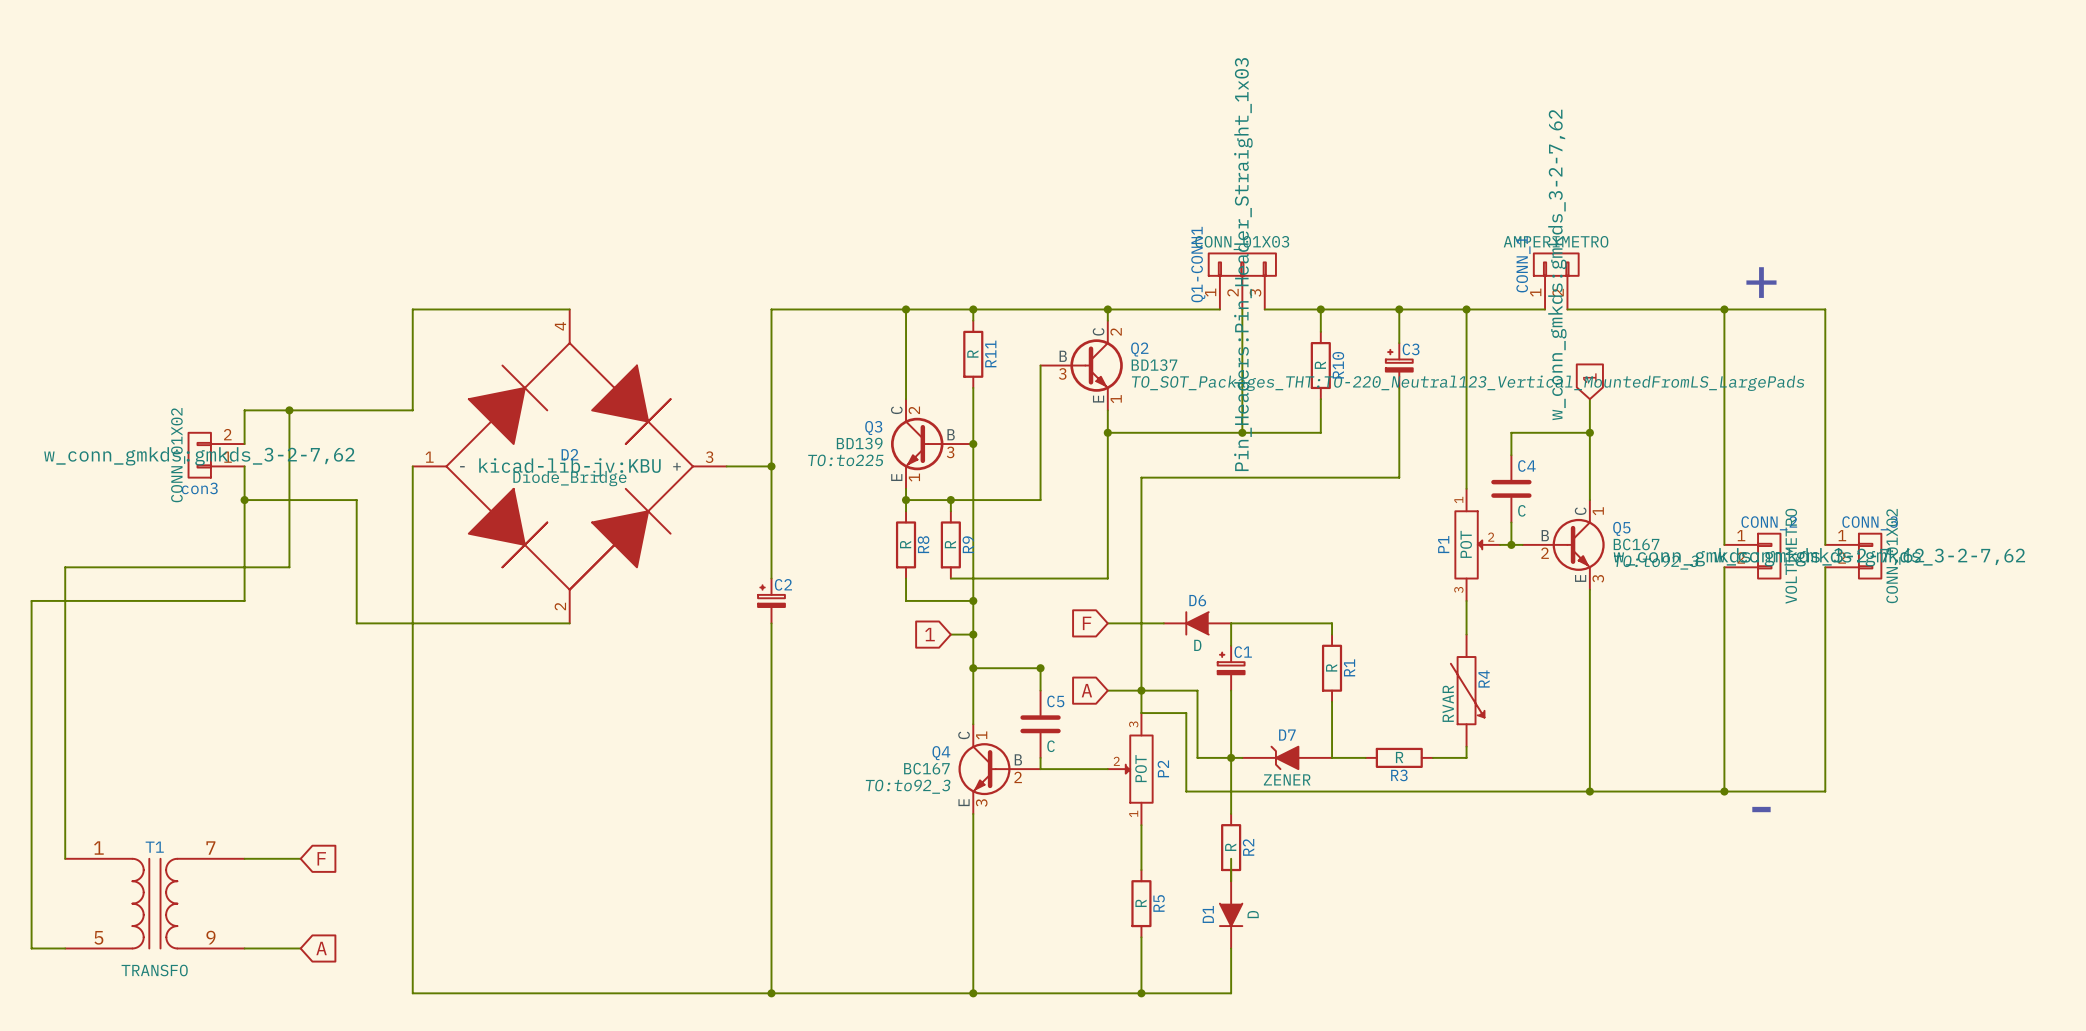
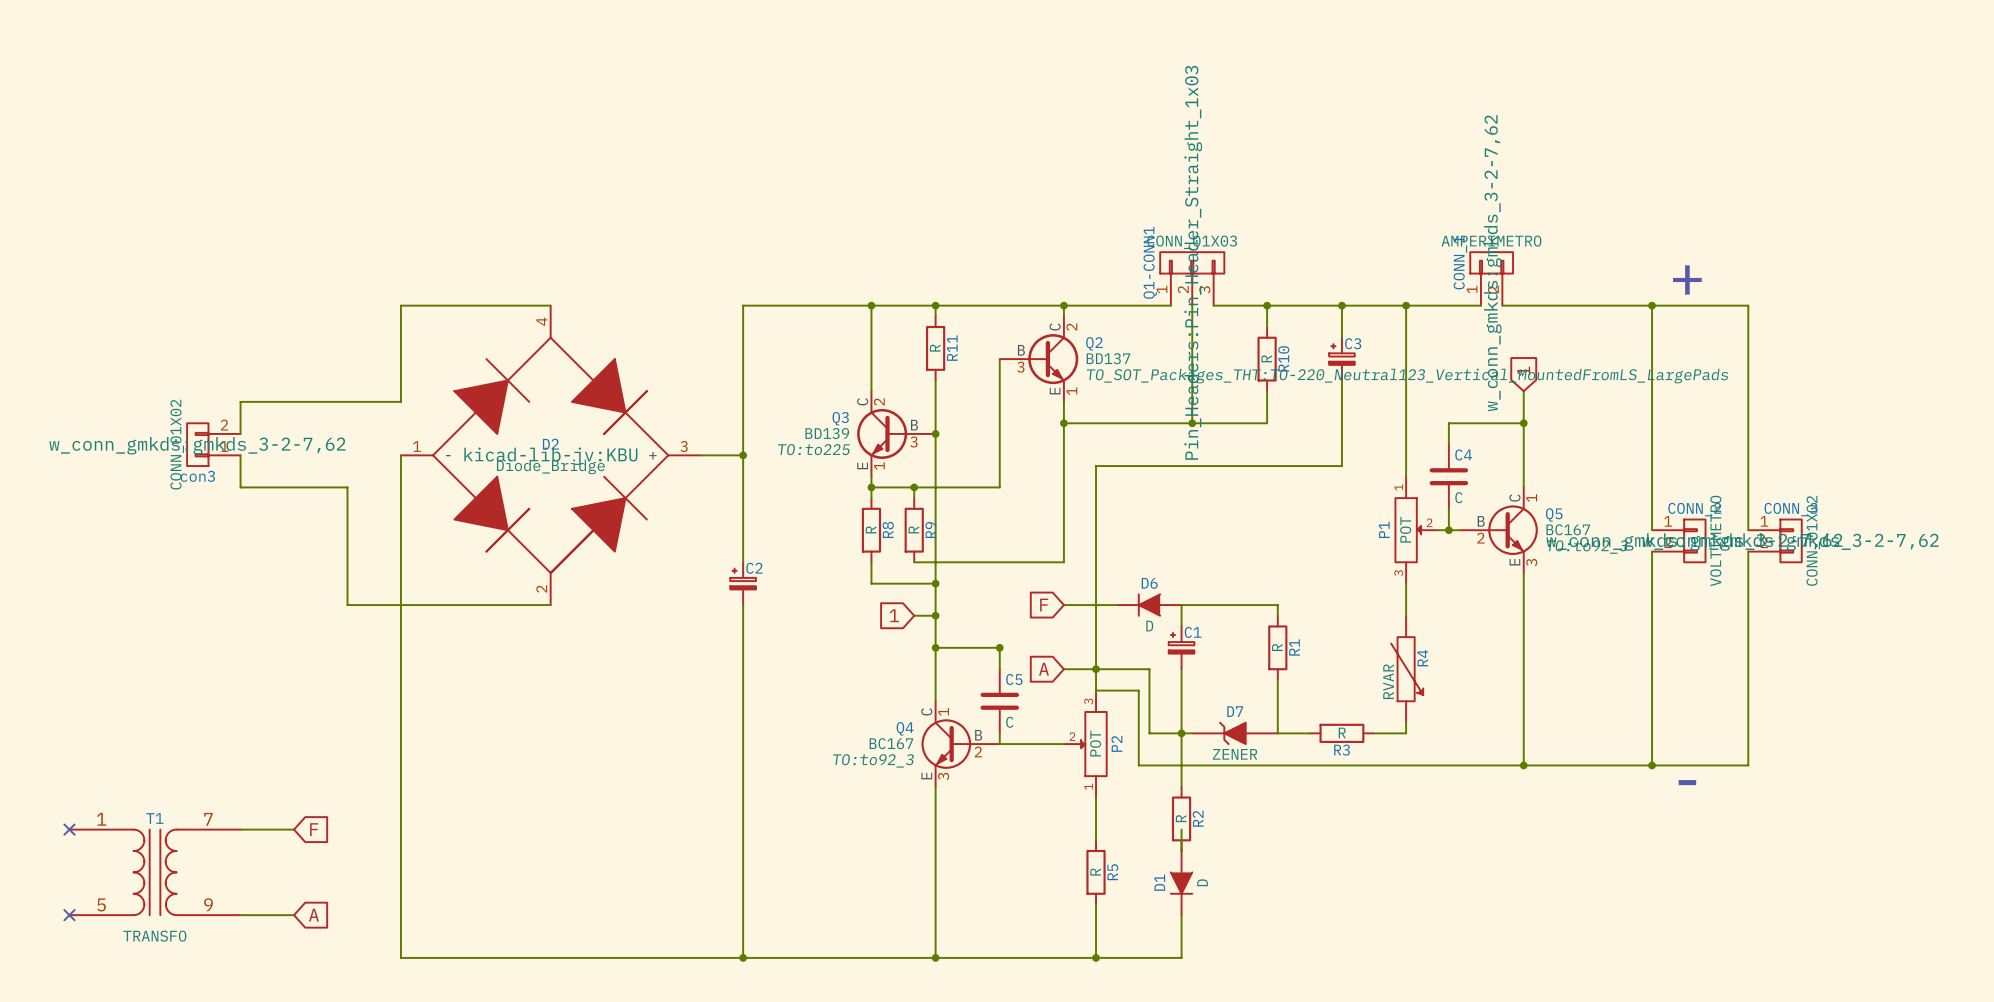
wire: (289, 410) (289, 567) (65, 567) (65, 858) -> none
junction: (289, 410) -> none
wire: (244, 500) (244, 600) (31, 600) (31, 948) (65, 948) -> none
junction: (244, 500) -> none
no-connect mark: none -> (69, 829)
no-connect mark: none -> (69, 915)

